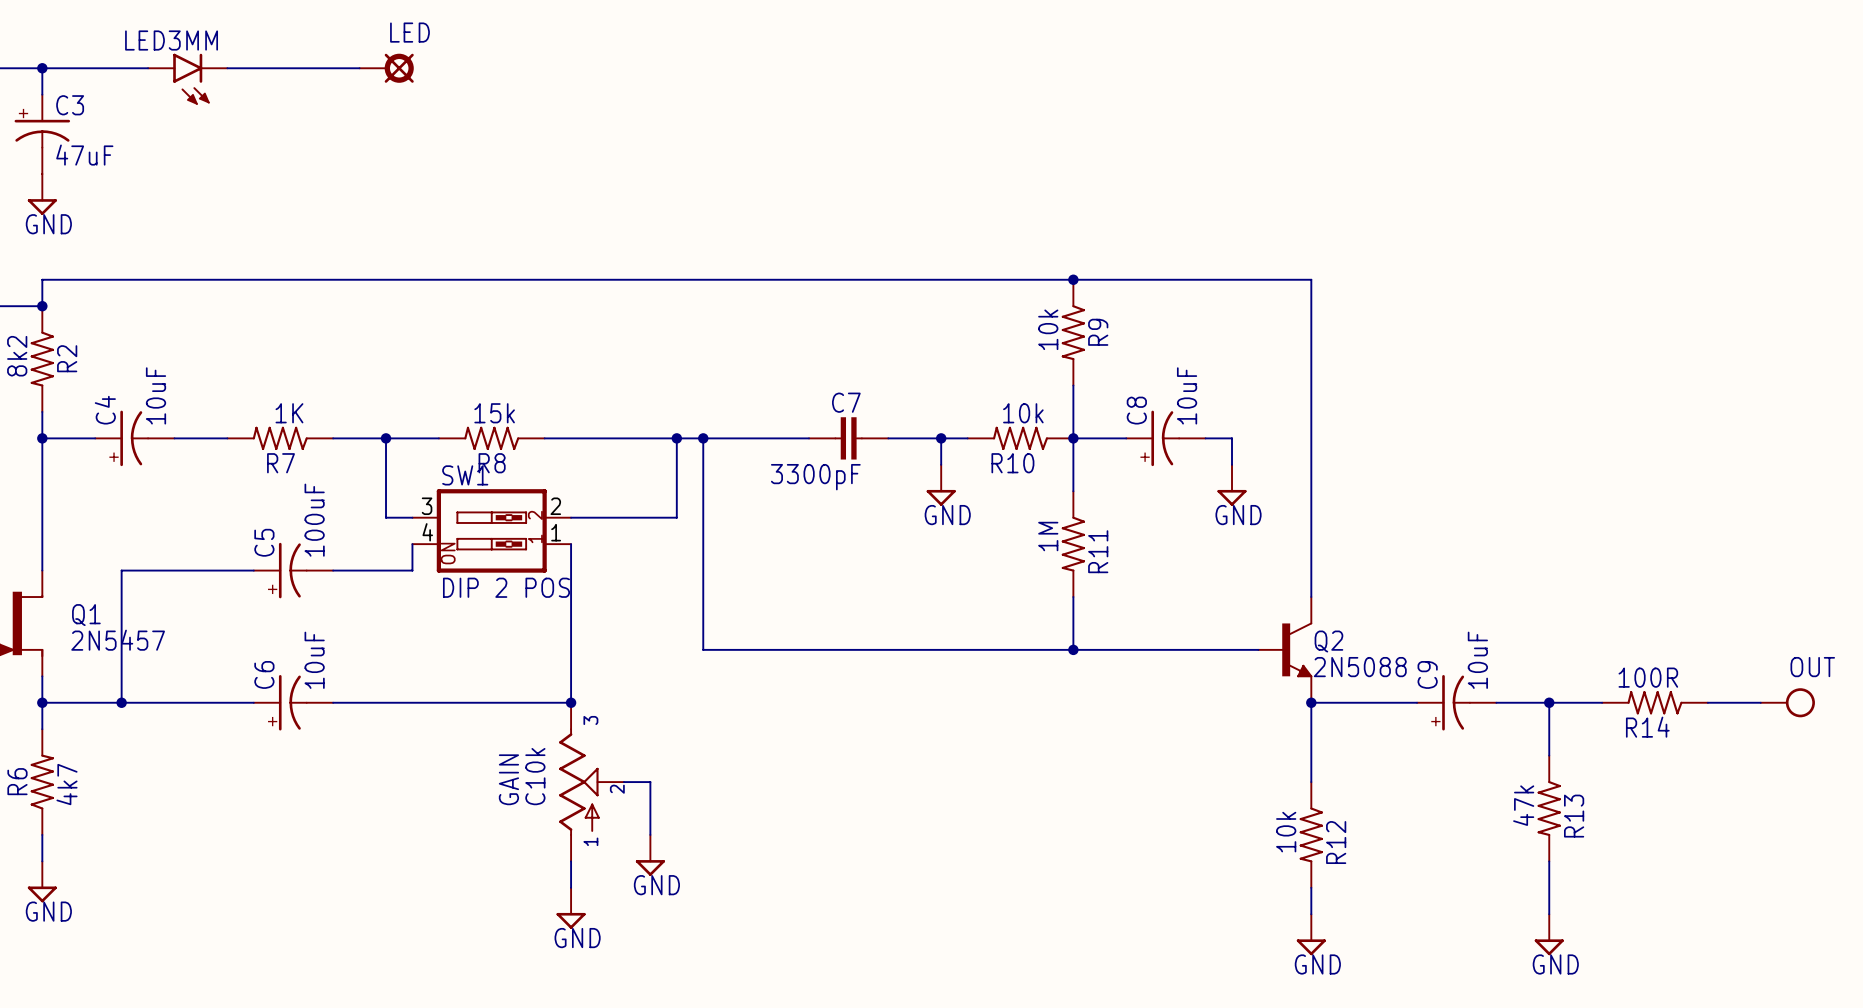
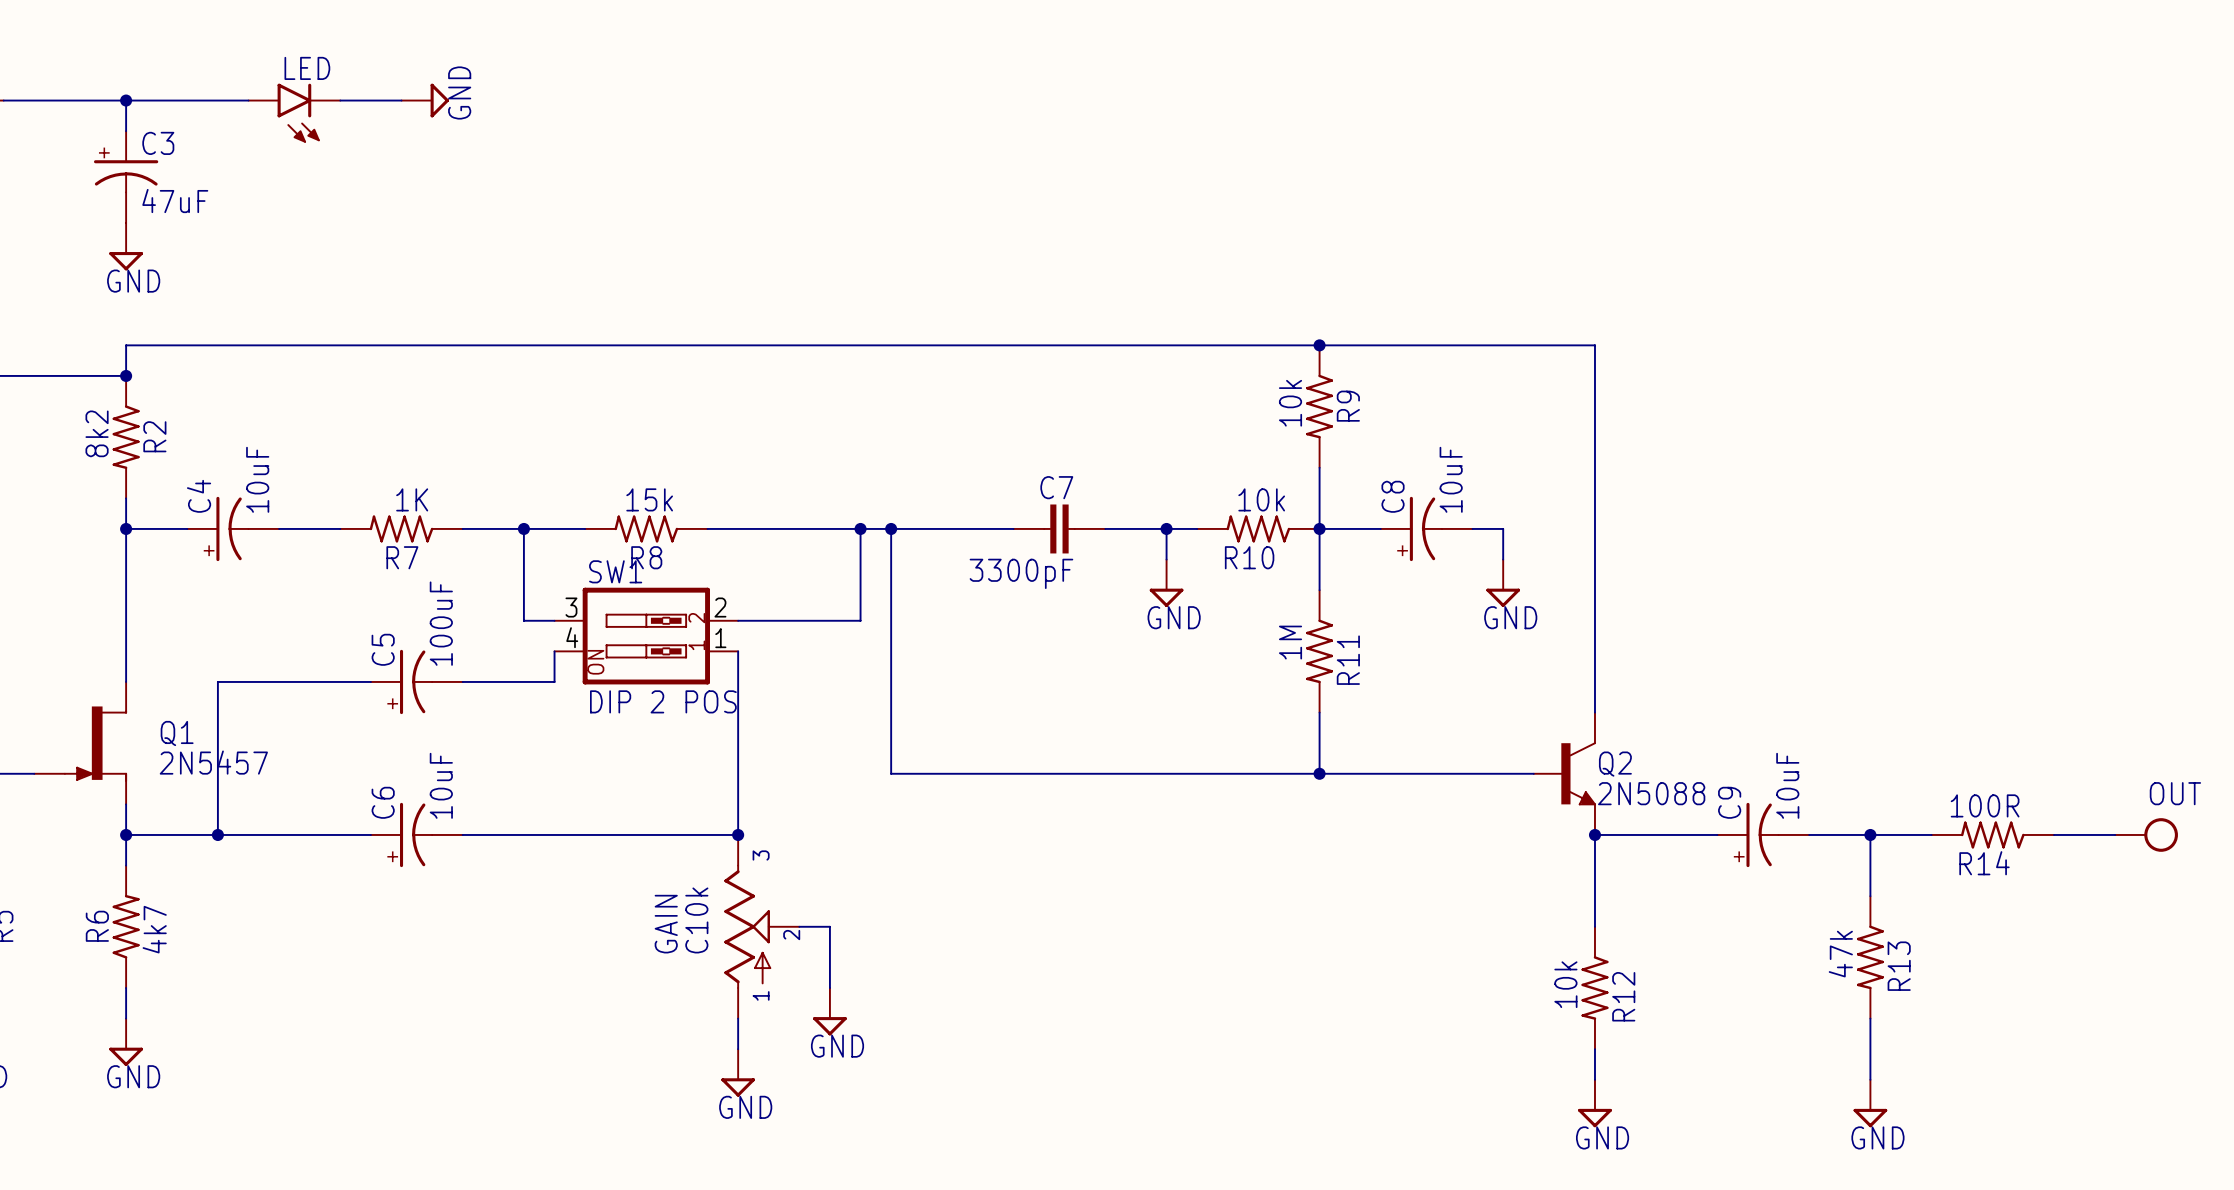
LED3MM name: LED3MM (171, 40) -> LED (307, 68)
wire: (280, 68) (359, 68) -> none
power symbol: none -> GND (425, 100)
LED: (386, 68) -> none

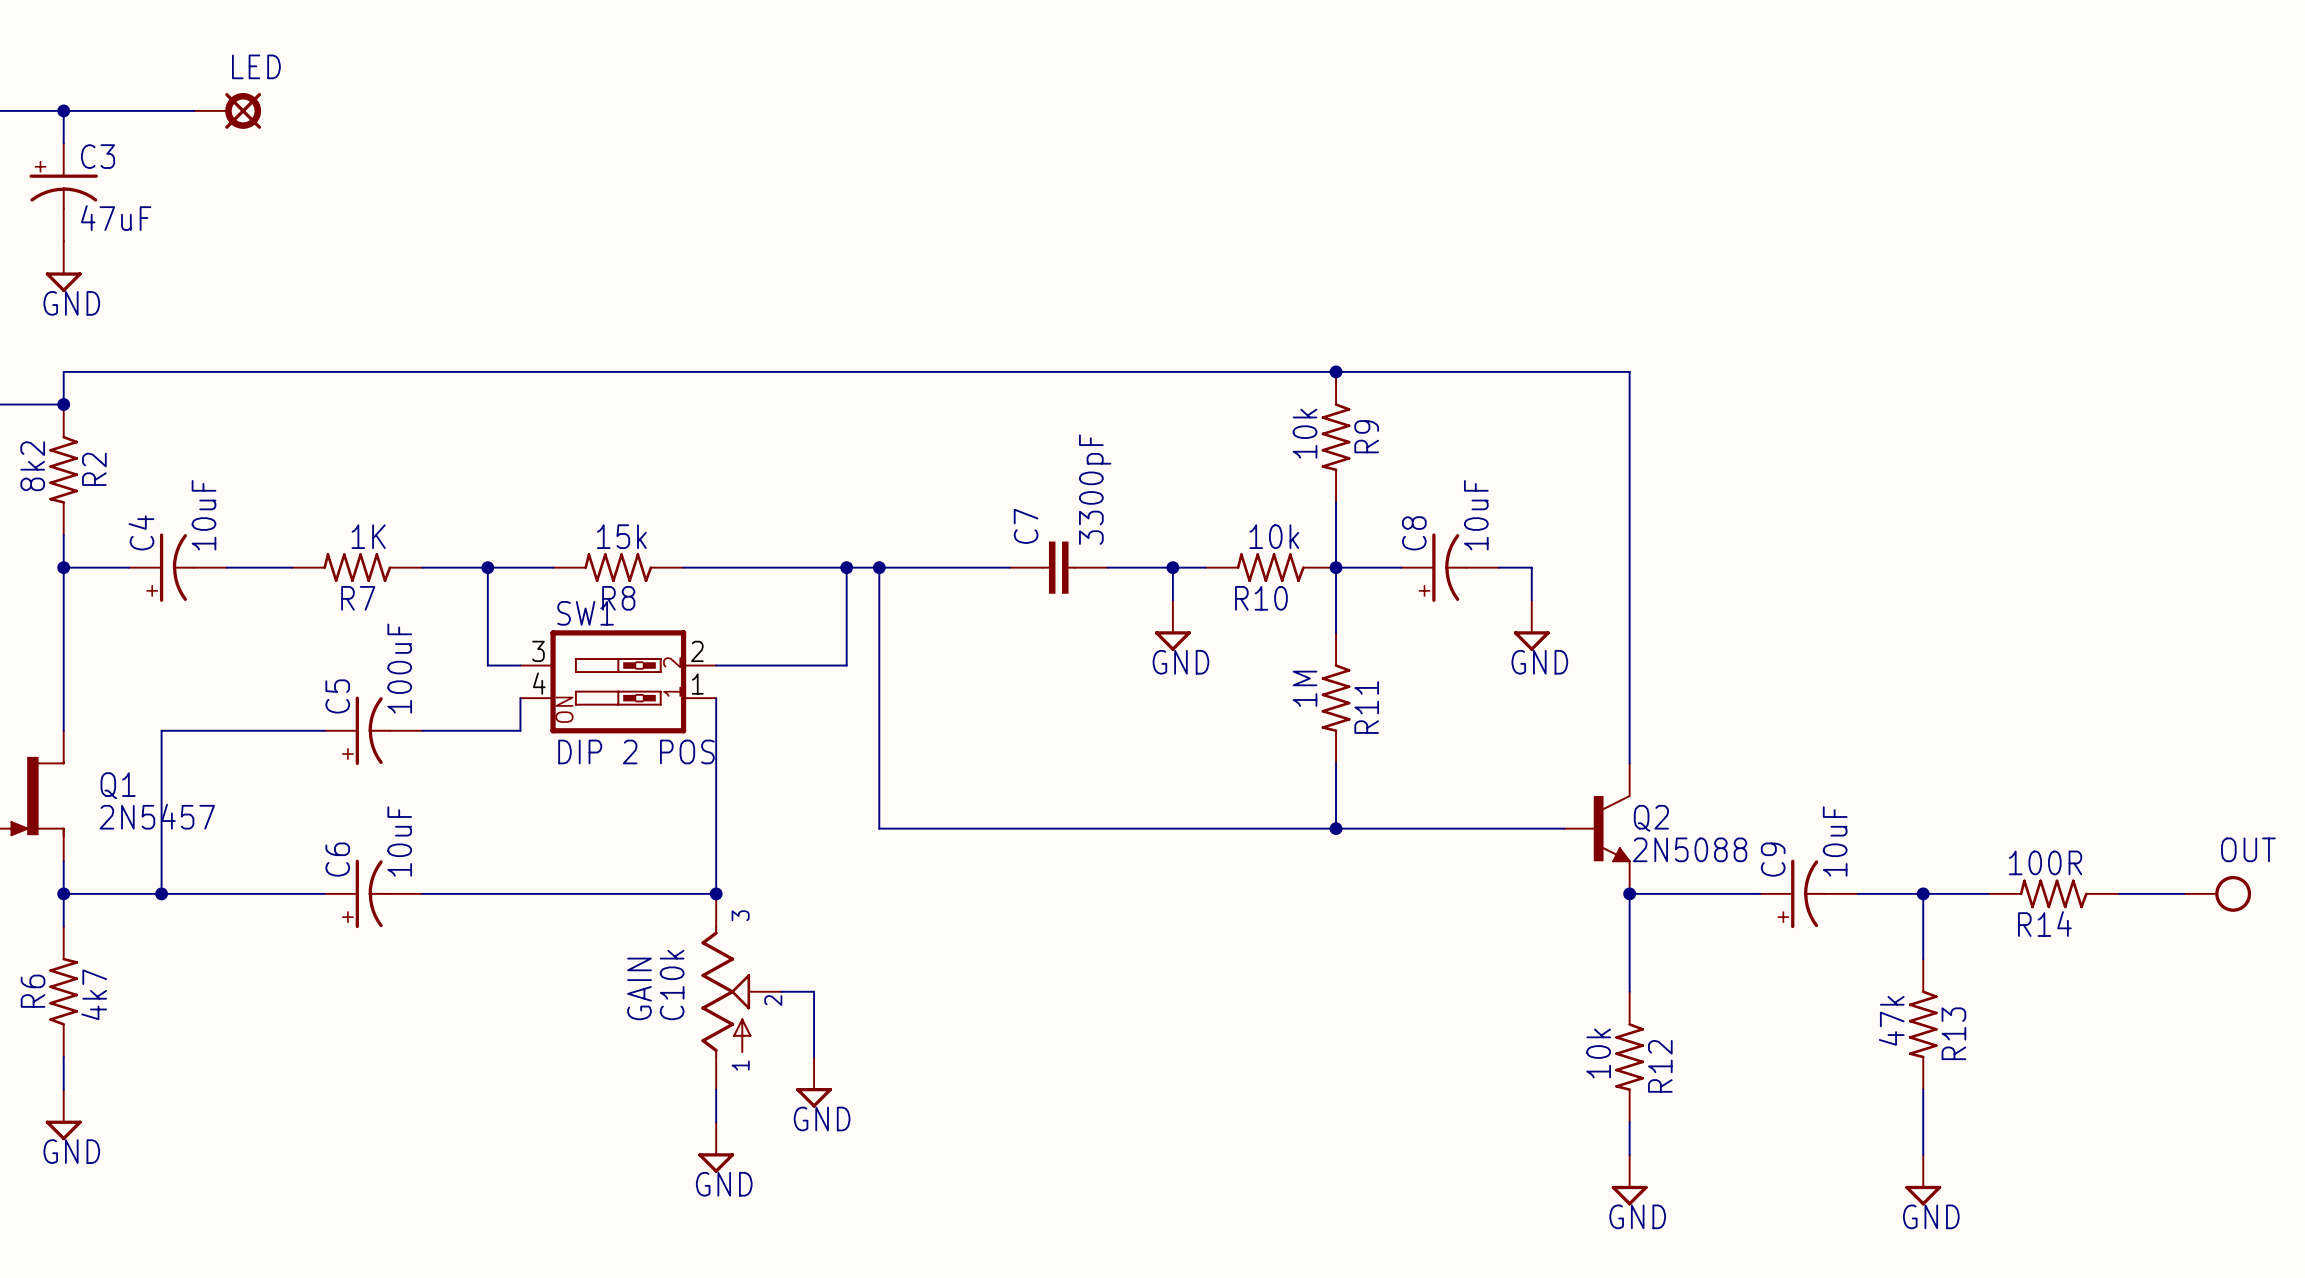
LED: none -> (227, 110)
wire: (340, 100) (401, 100) -> none
power symbol: GND (425, 100) -> none
LED: (294, 113) -> none
C7 name rotation: 0° (1056, 487) -> 90° counterclockwise (1026, 526)
C7 value rotation: 0° (1021, 573) -> 90° counterclockwise (1095, 489)
C7 value position: 3300pF (1021, 573) -> 3300pF (1095, 489)

